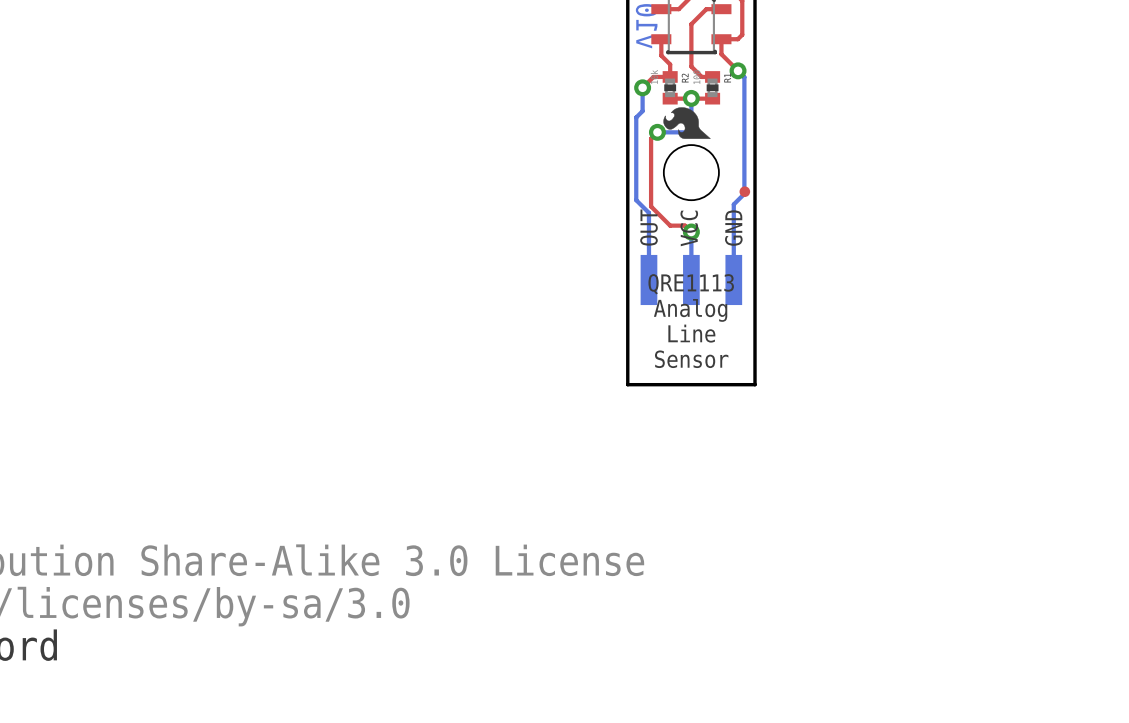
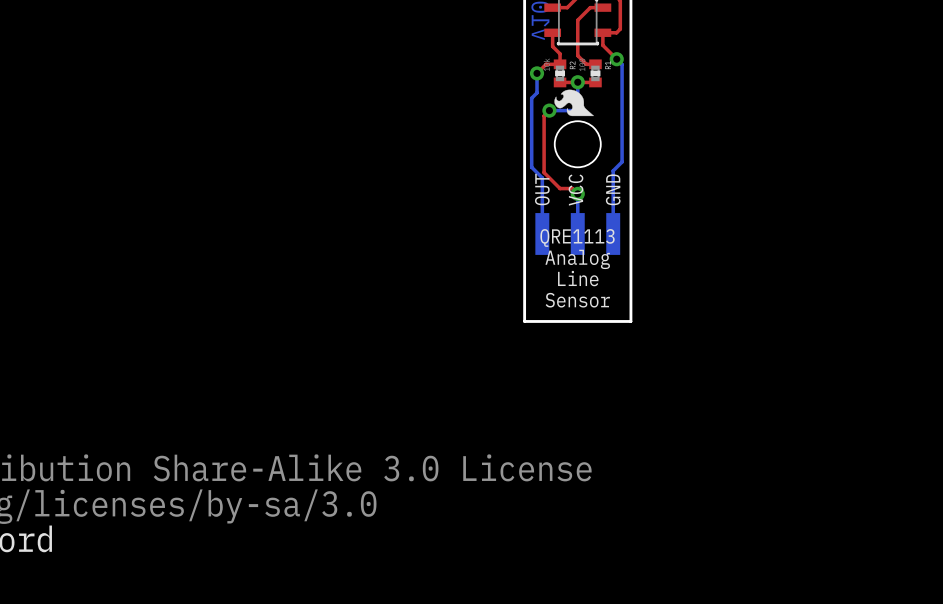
part: (744, 191) -> none

